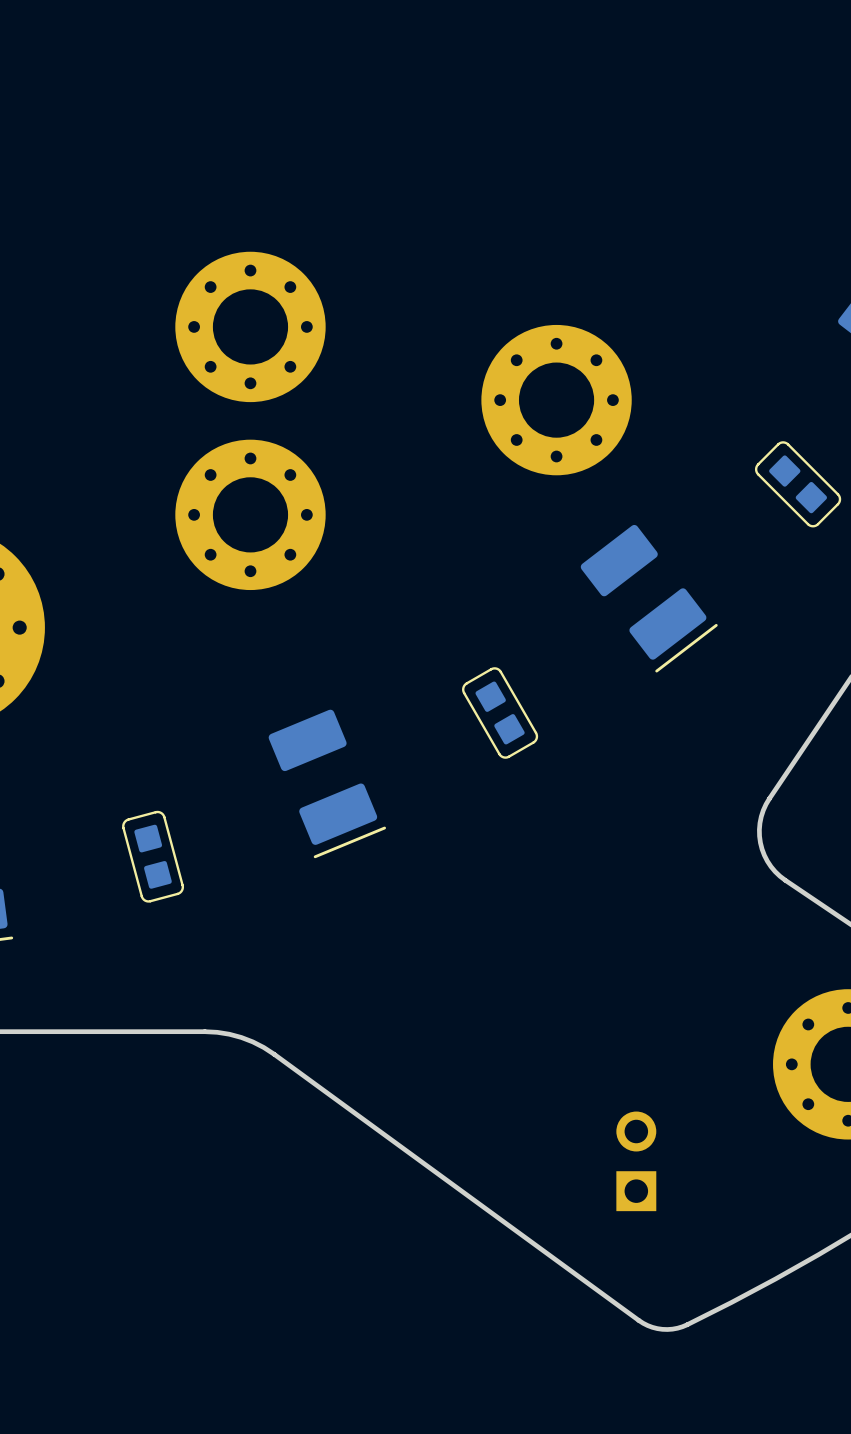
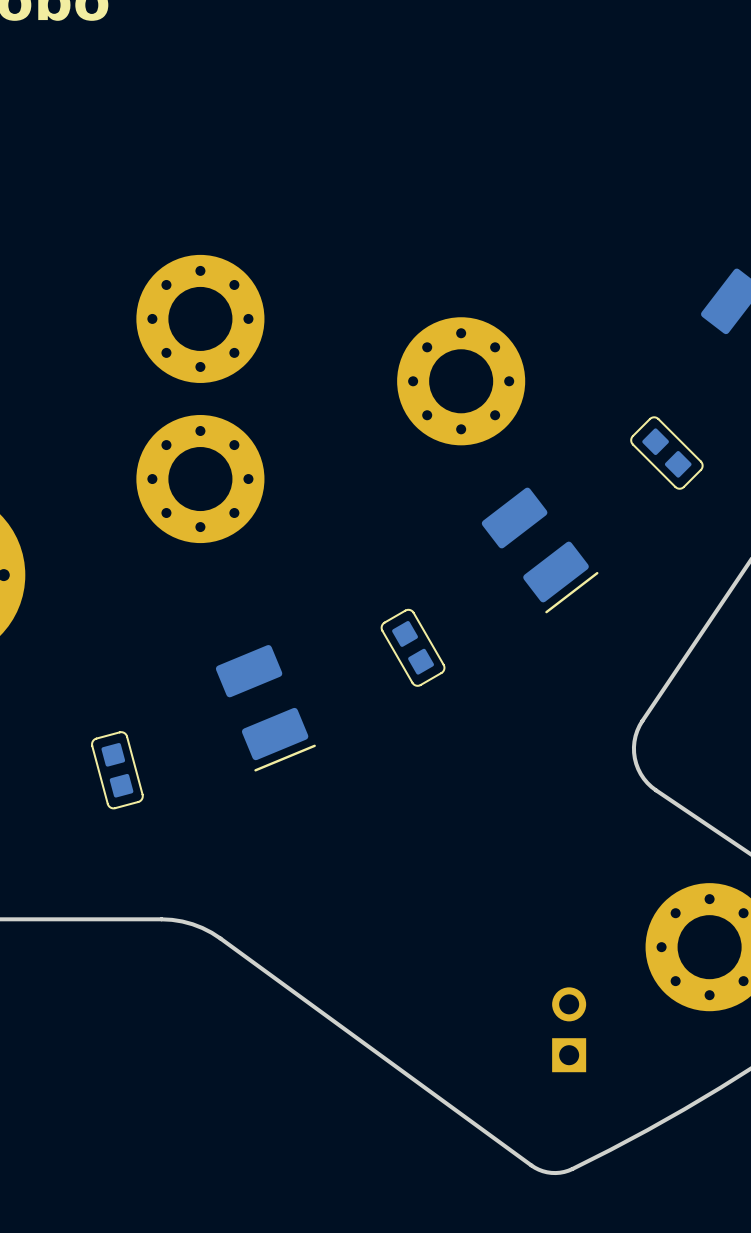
part position: (636, 1161) -> (569, 1029)

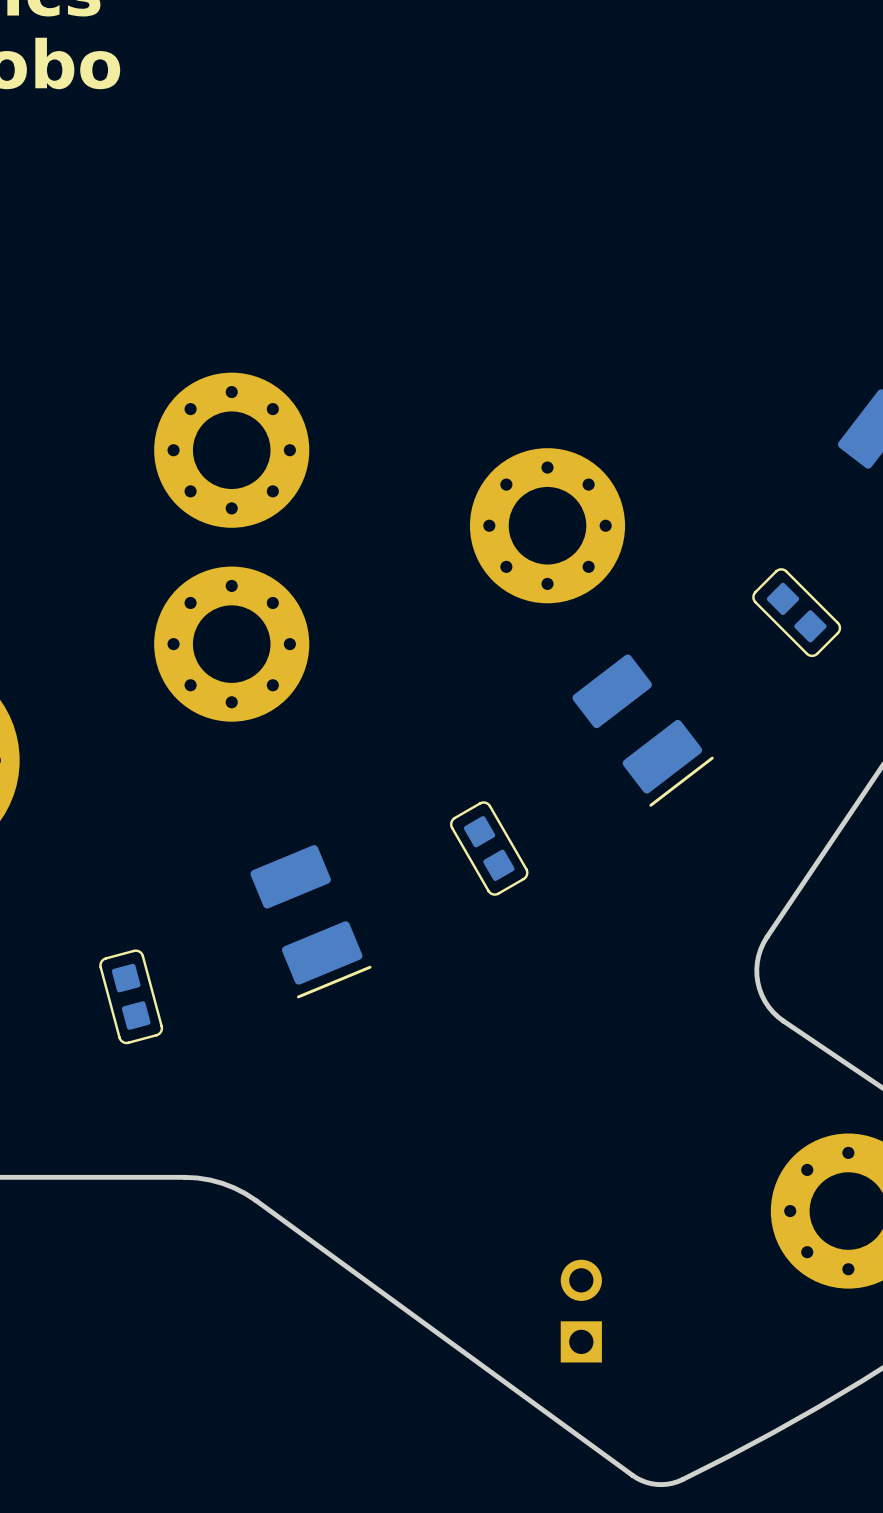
part position: (569, 1029) -> (581, 1311)

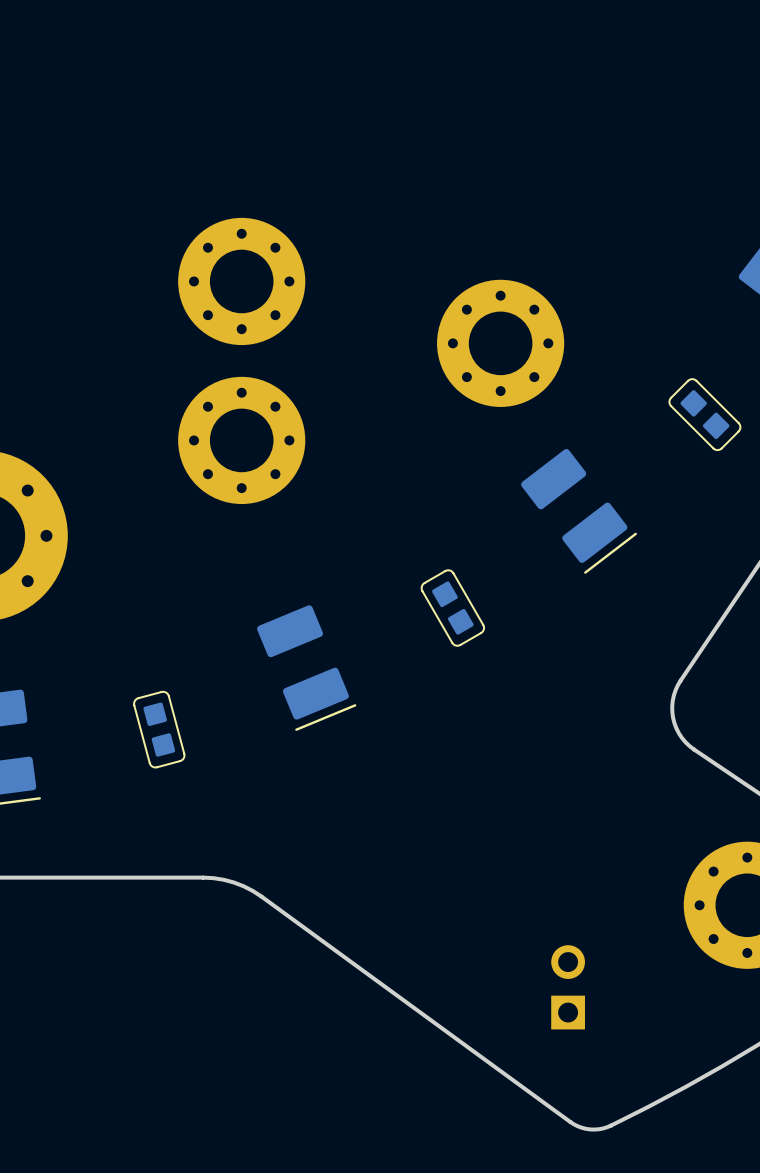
part position: (581, 1311) -> (568, 987)

